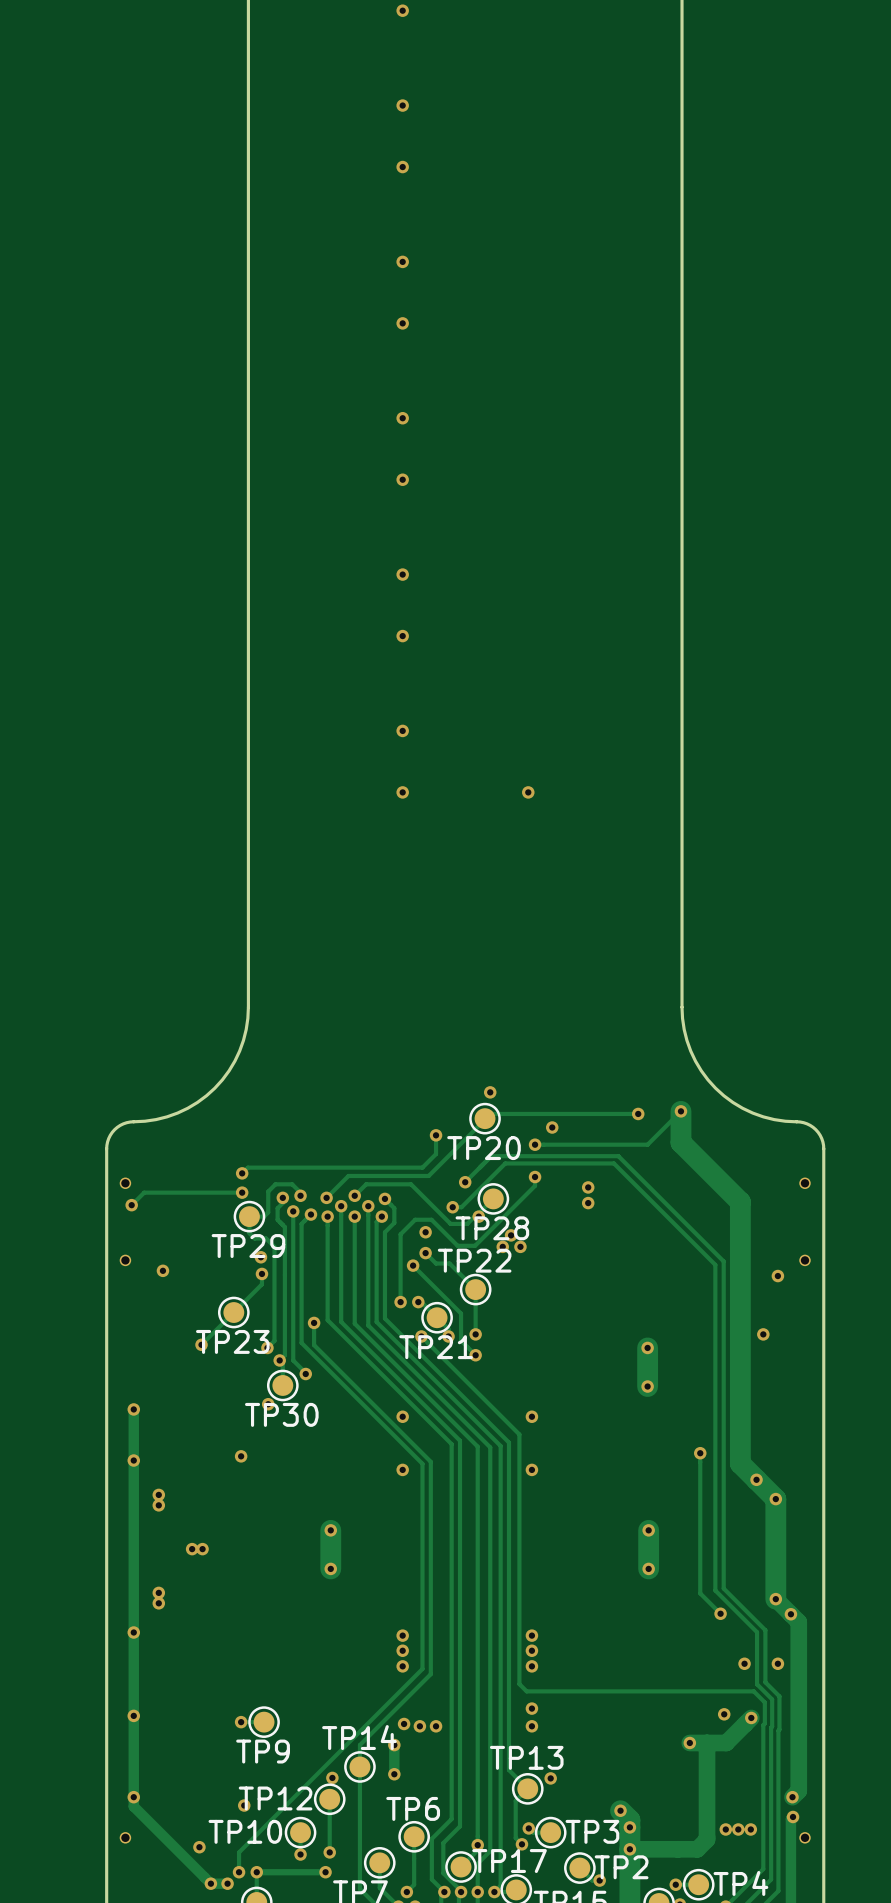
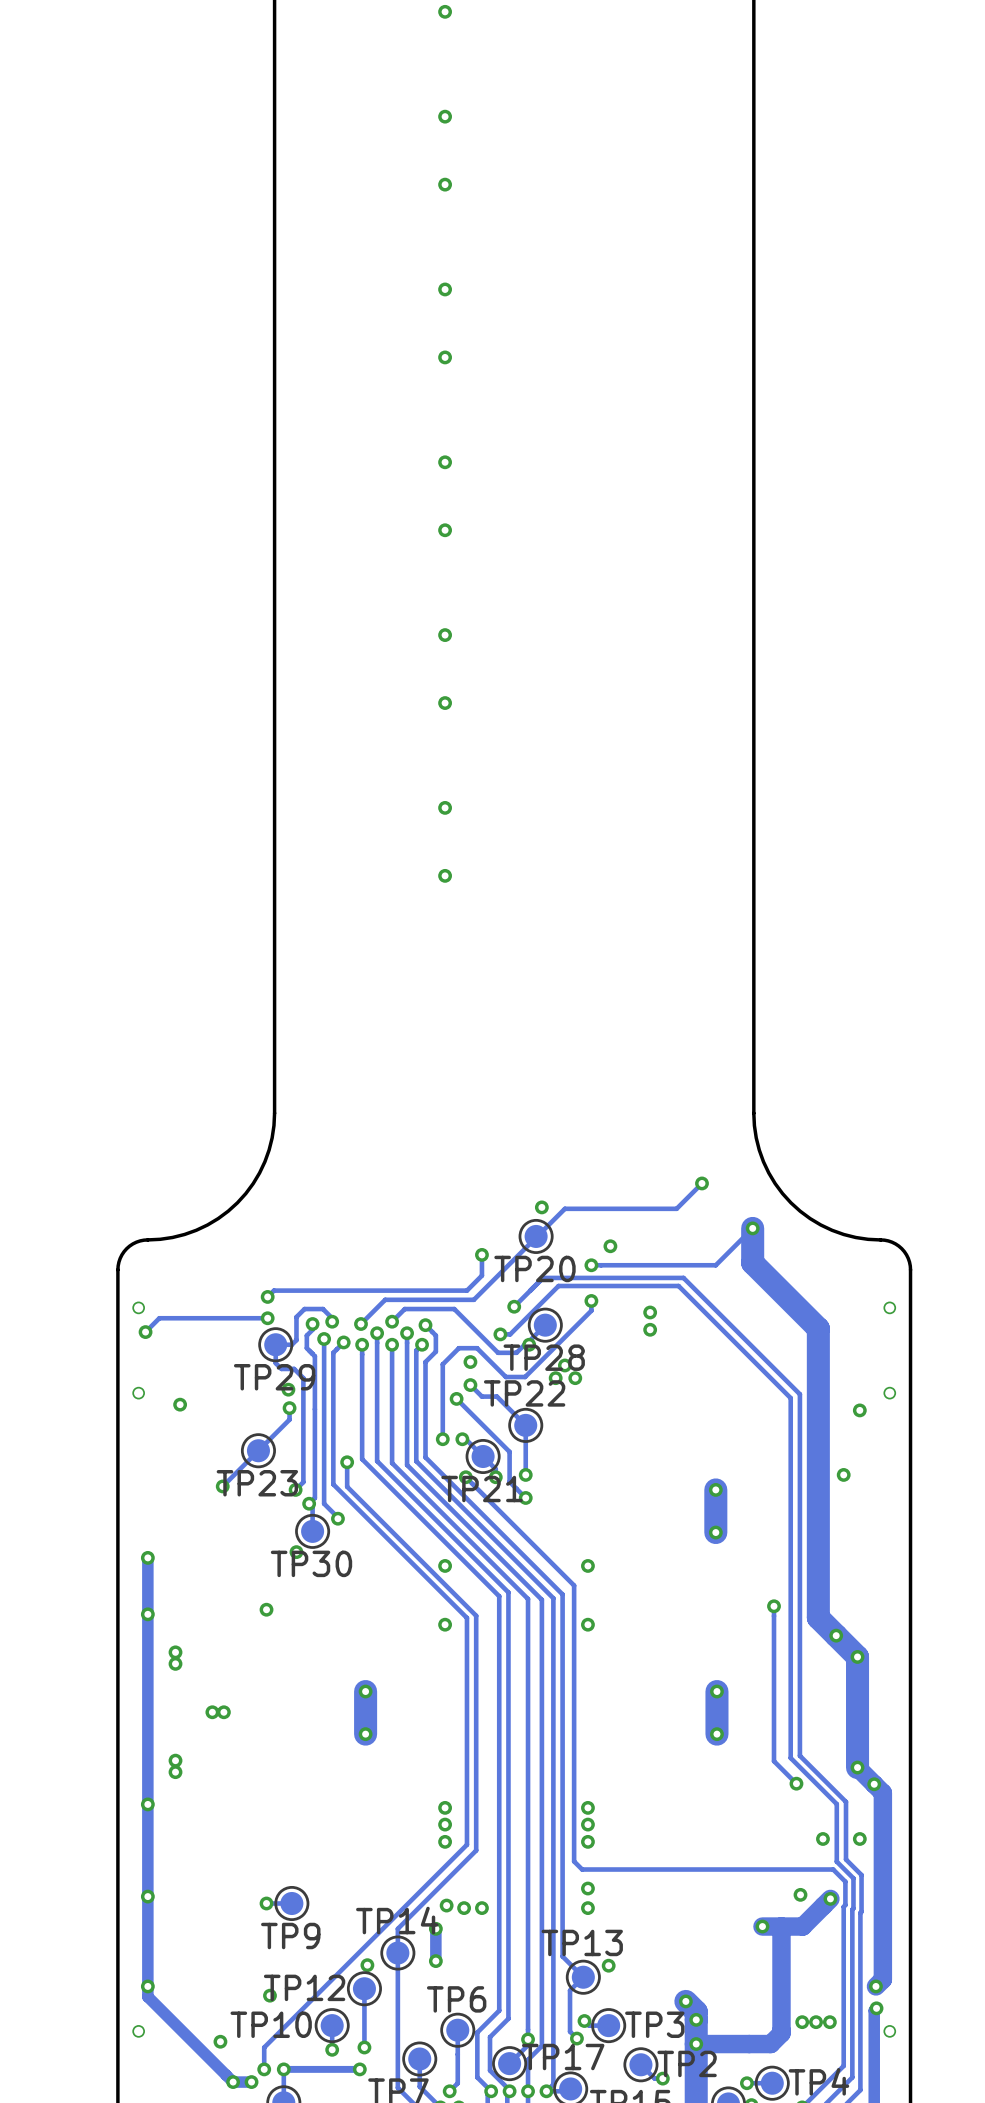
via: (528, 792) -> none
track: (638, 1113) (490, 1113) -> (701, 1183) (676, 1208) (564, 1208) (542, 1231)
via position: (638, 1113) -> (701, 1183)

